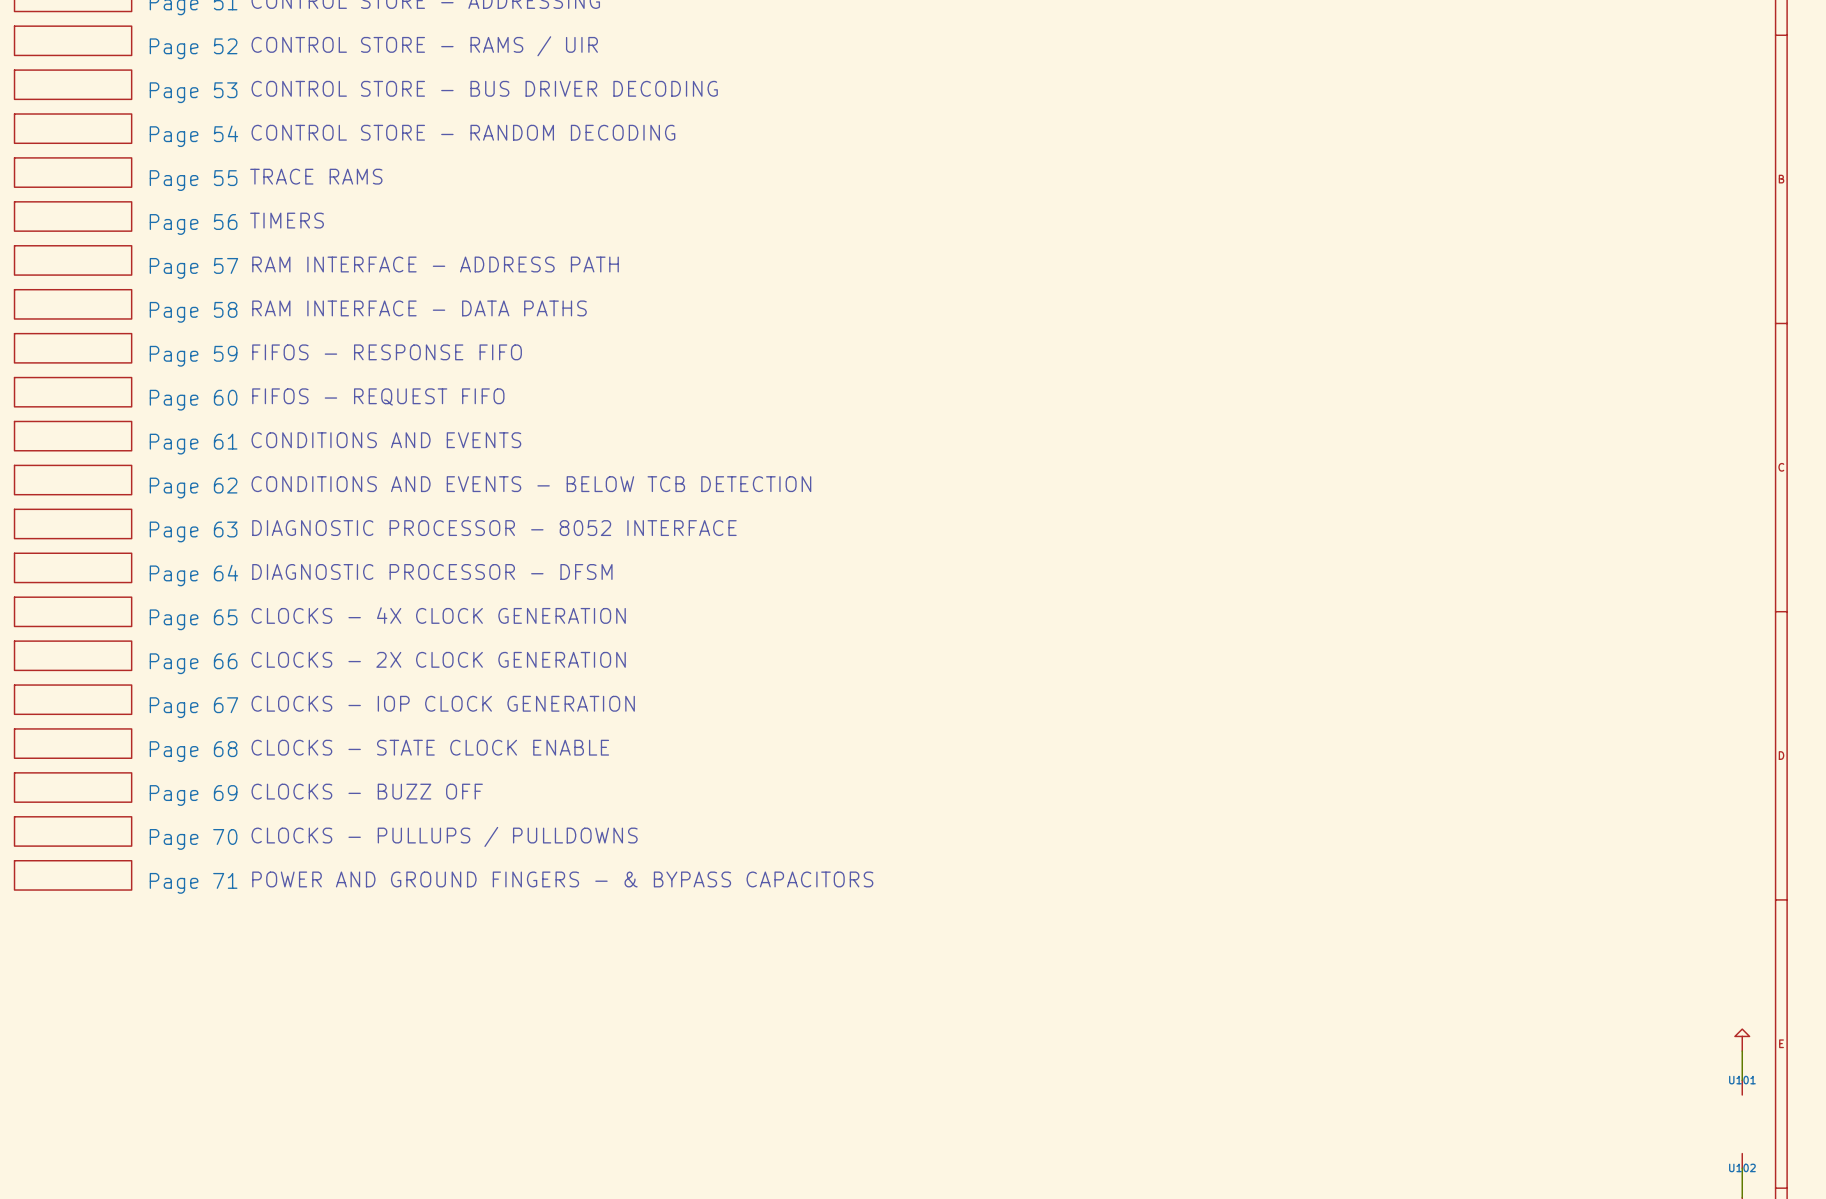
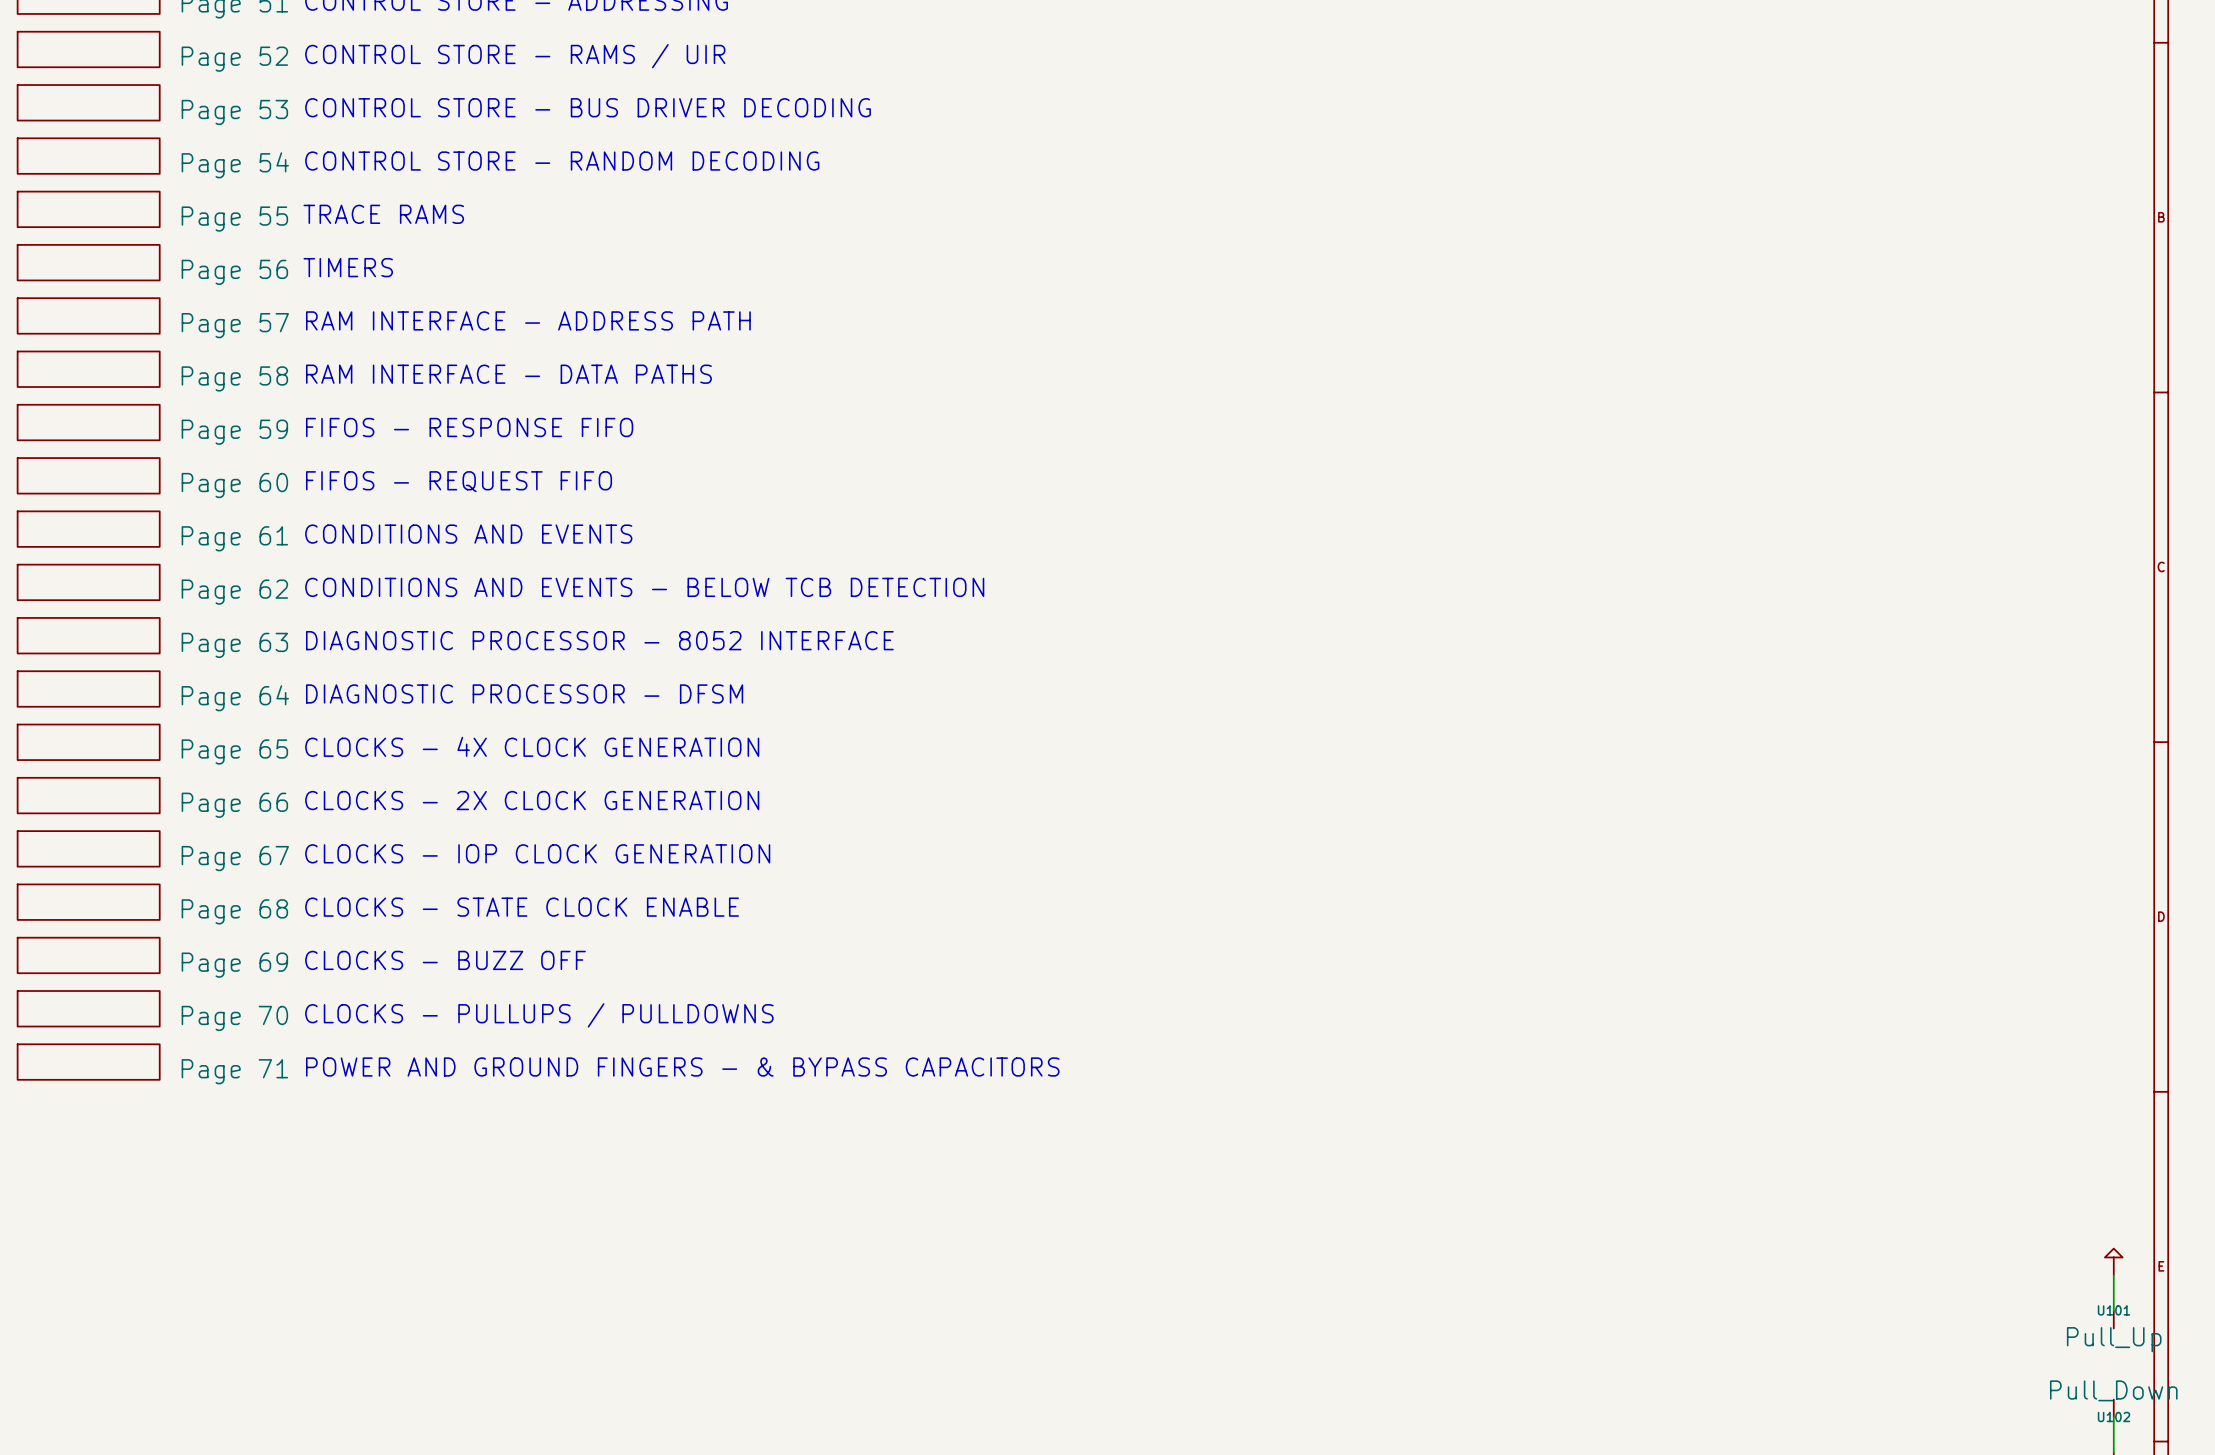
U101 value: none -> Pull_Up (2114, 1339)
U102 value: none -> Pull_Down (2113, 1390)

